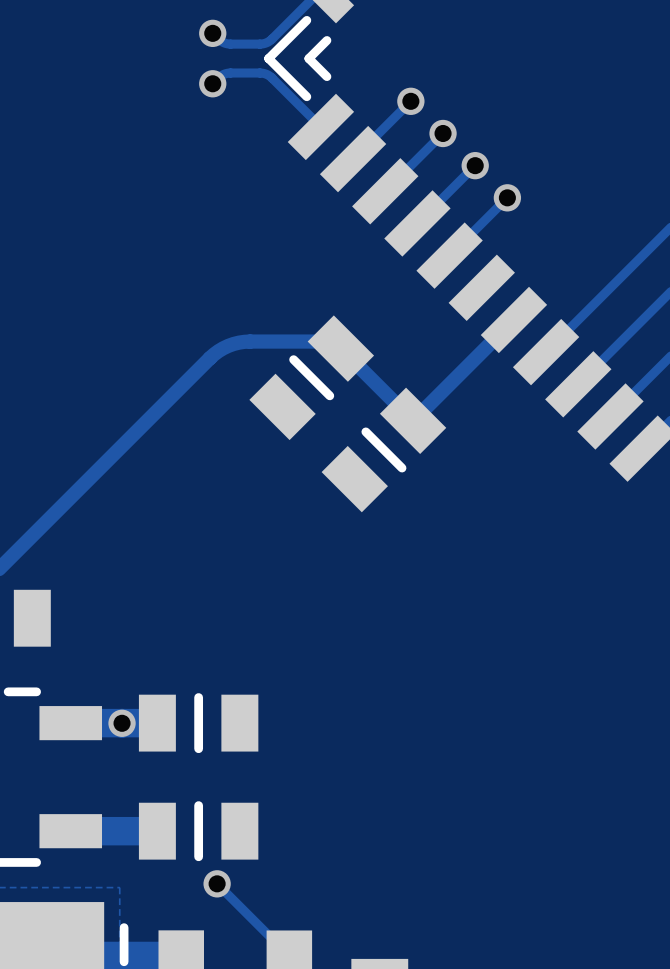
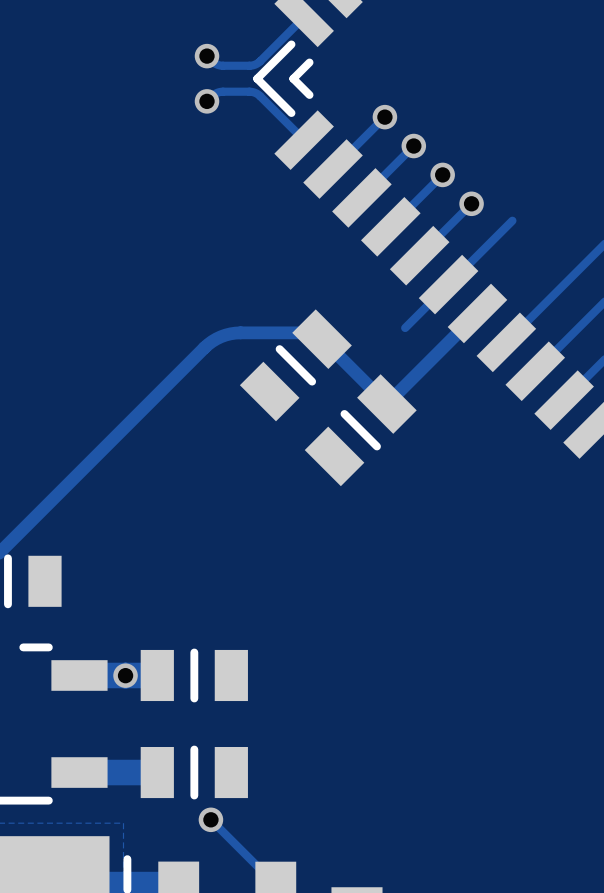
track: none -> (512, 220) (405, 327)

